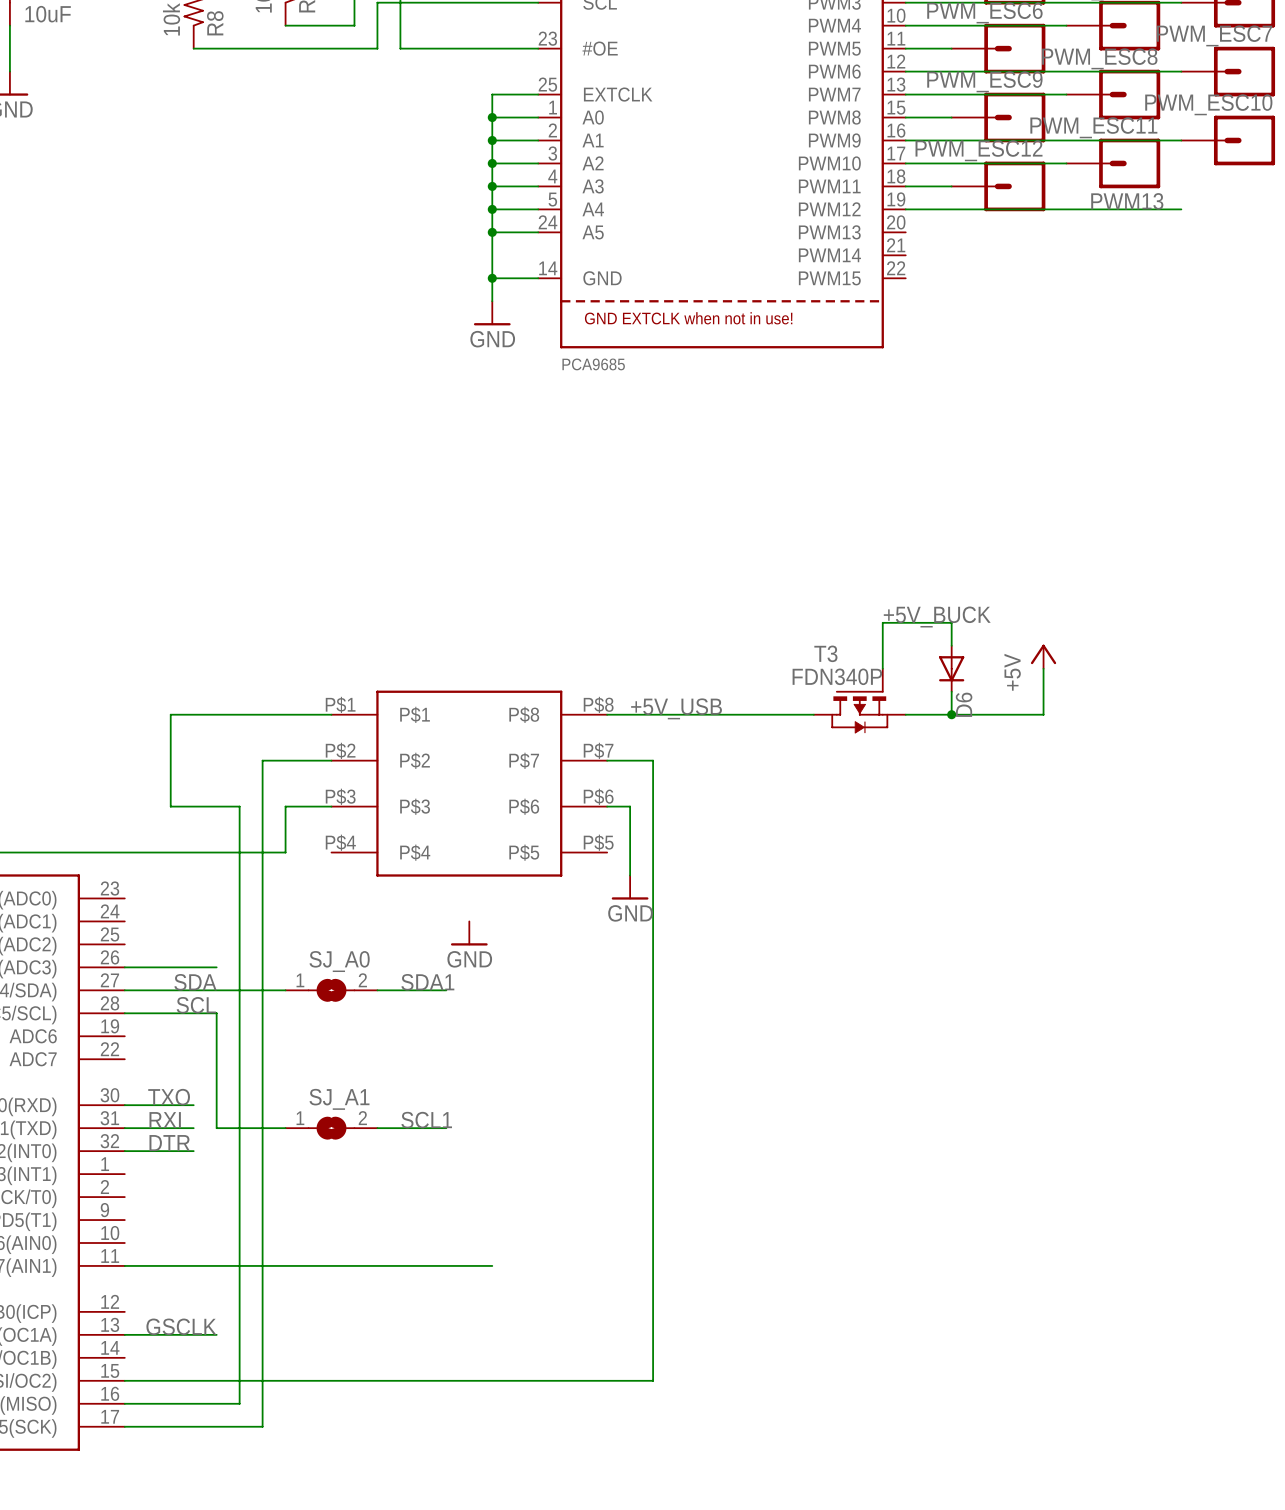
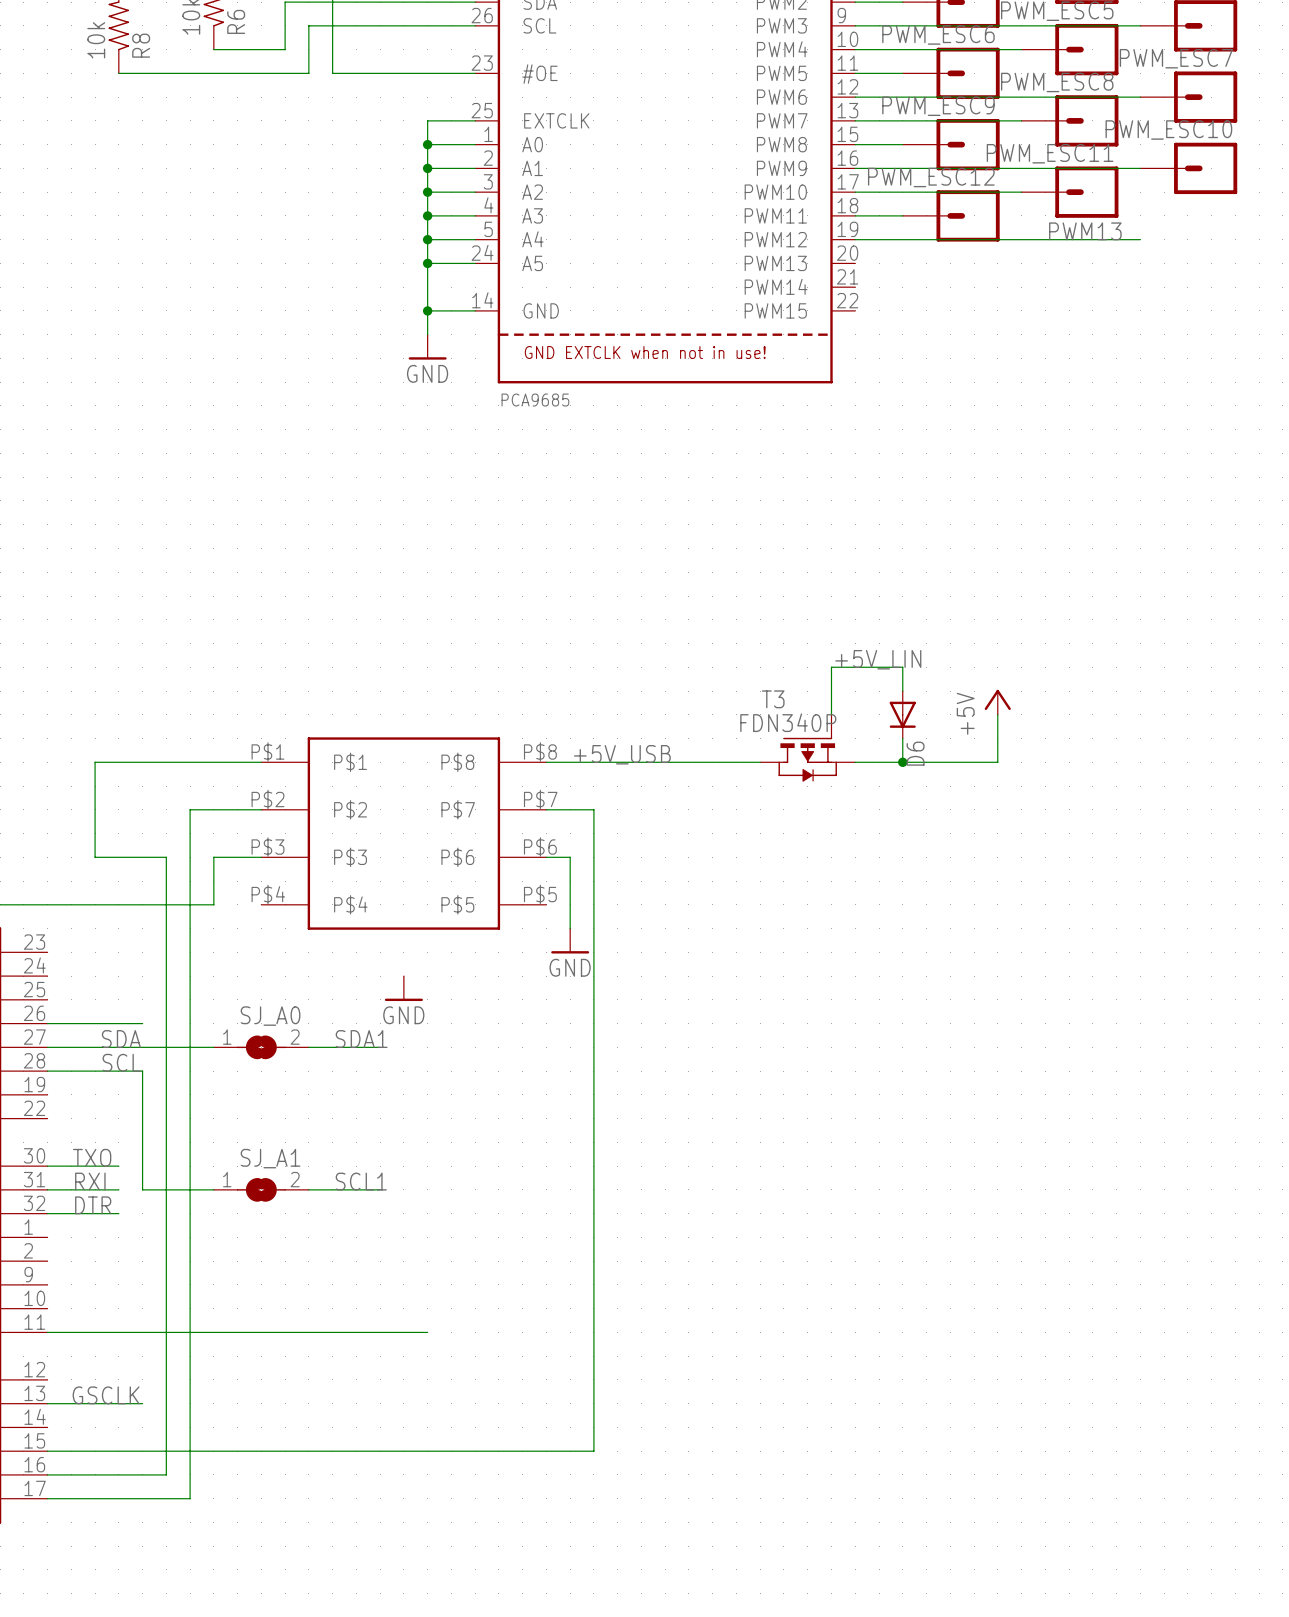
label: +5V_BUCK (937, 617) -> +5V_LIN (878, 659)

